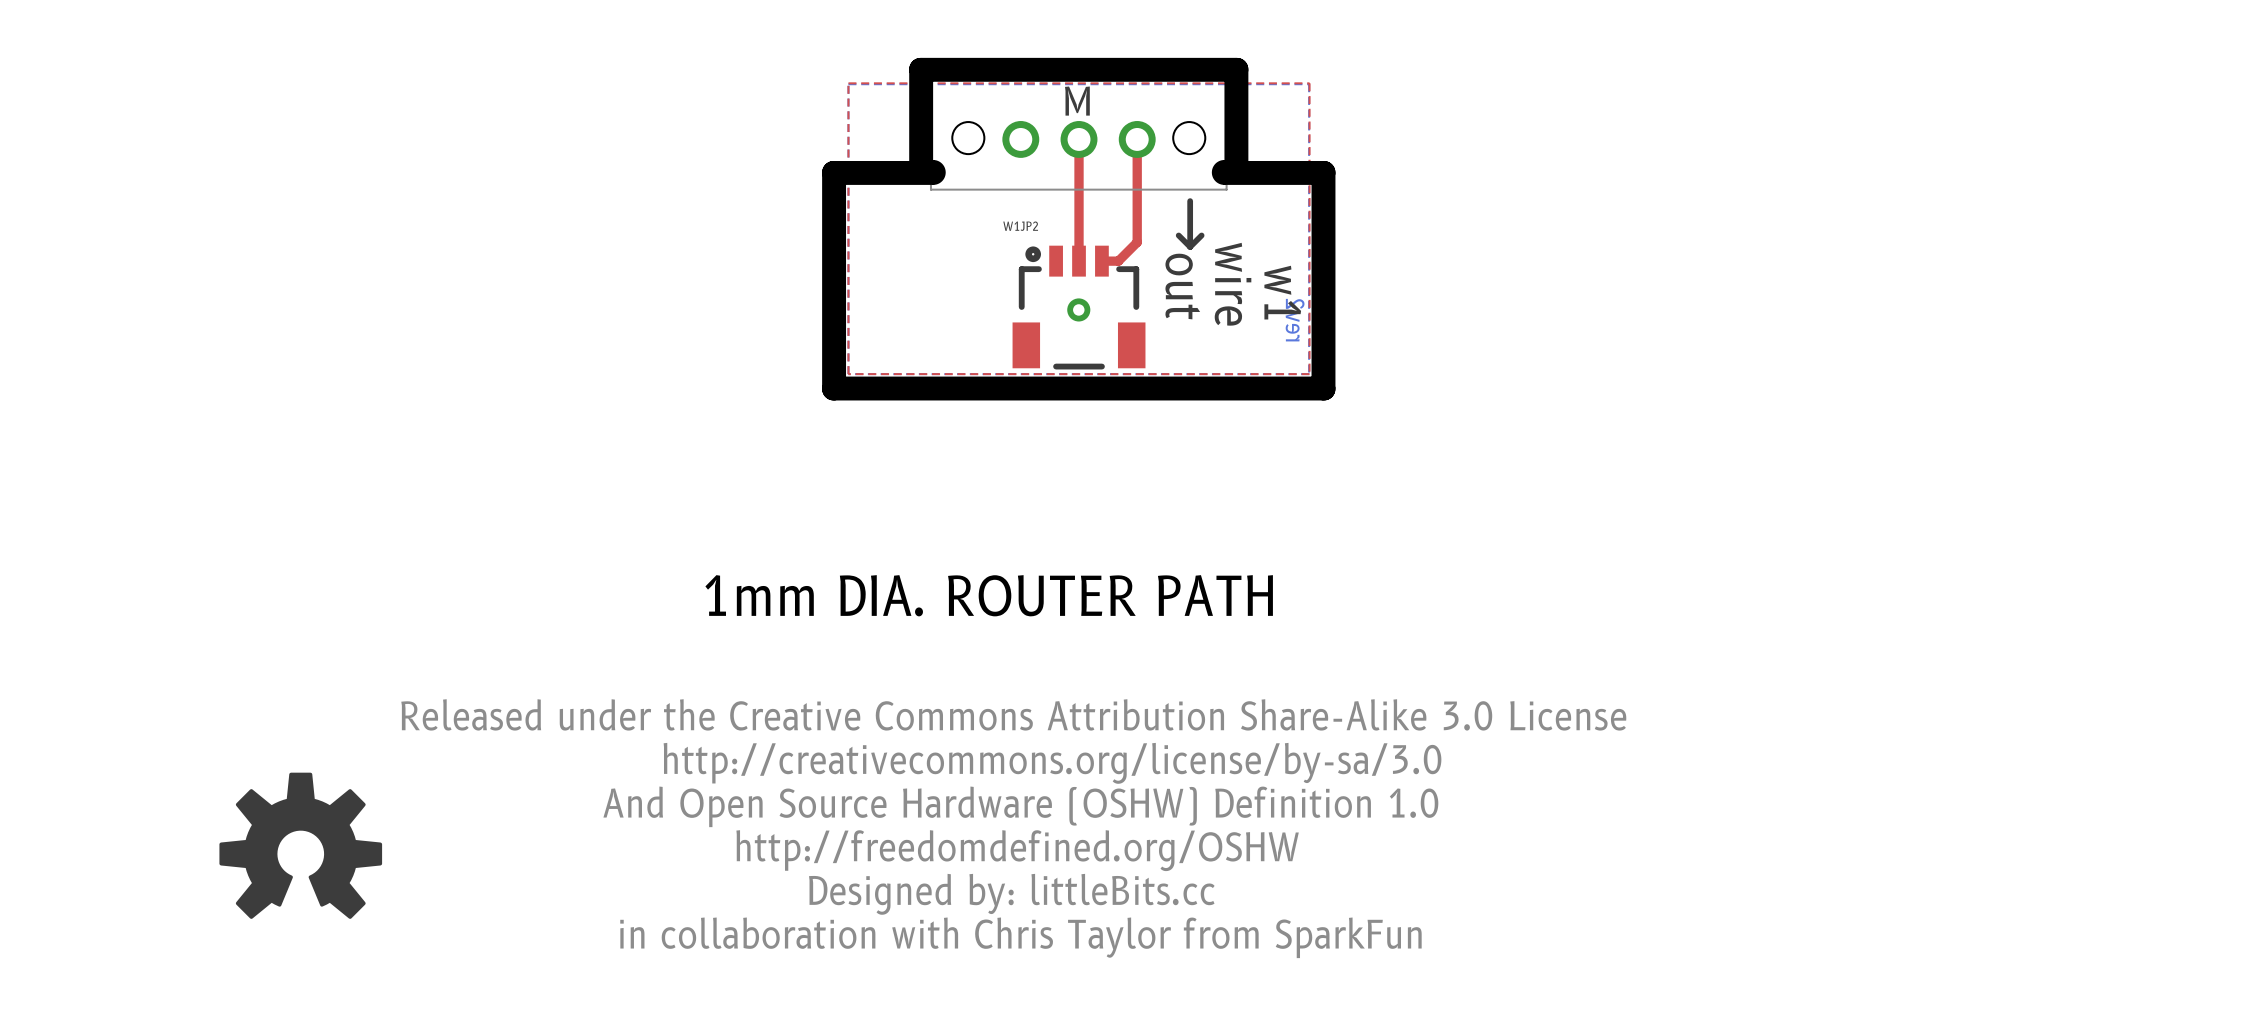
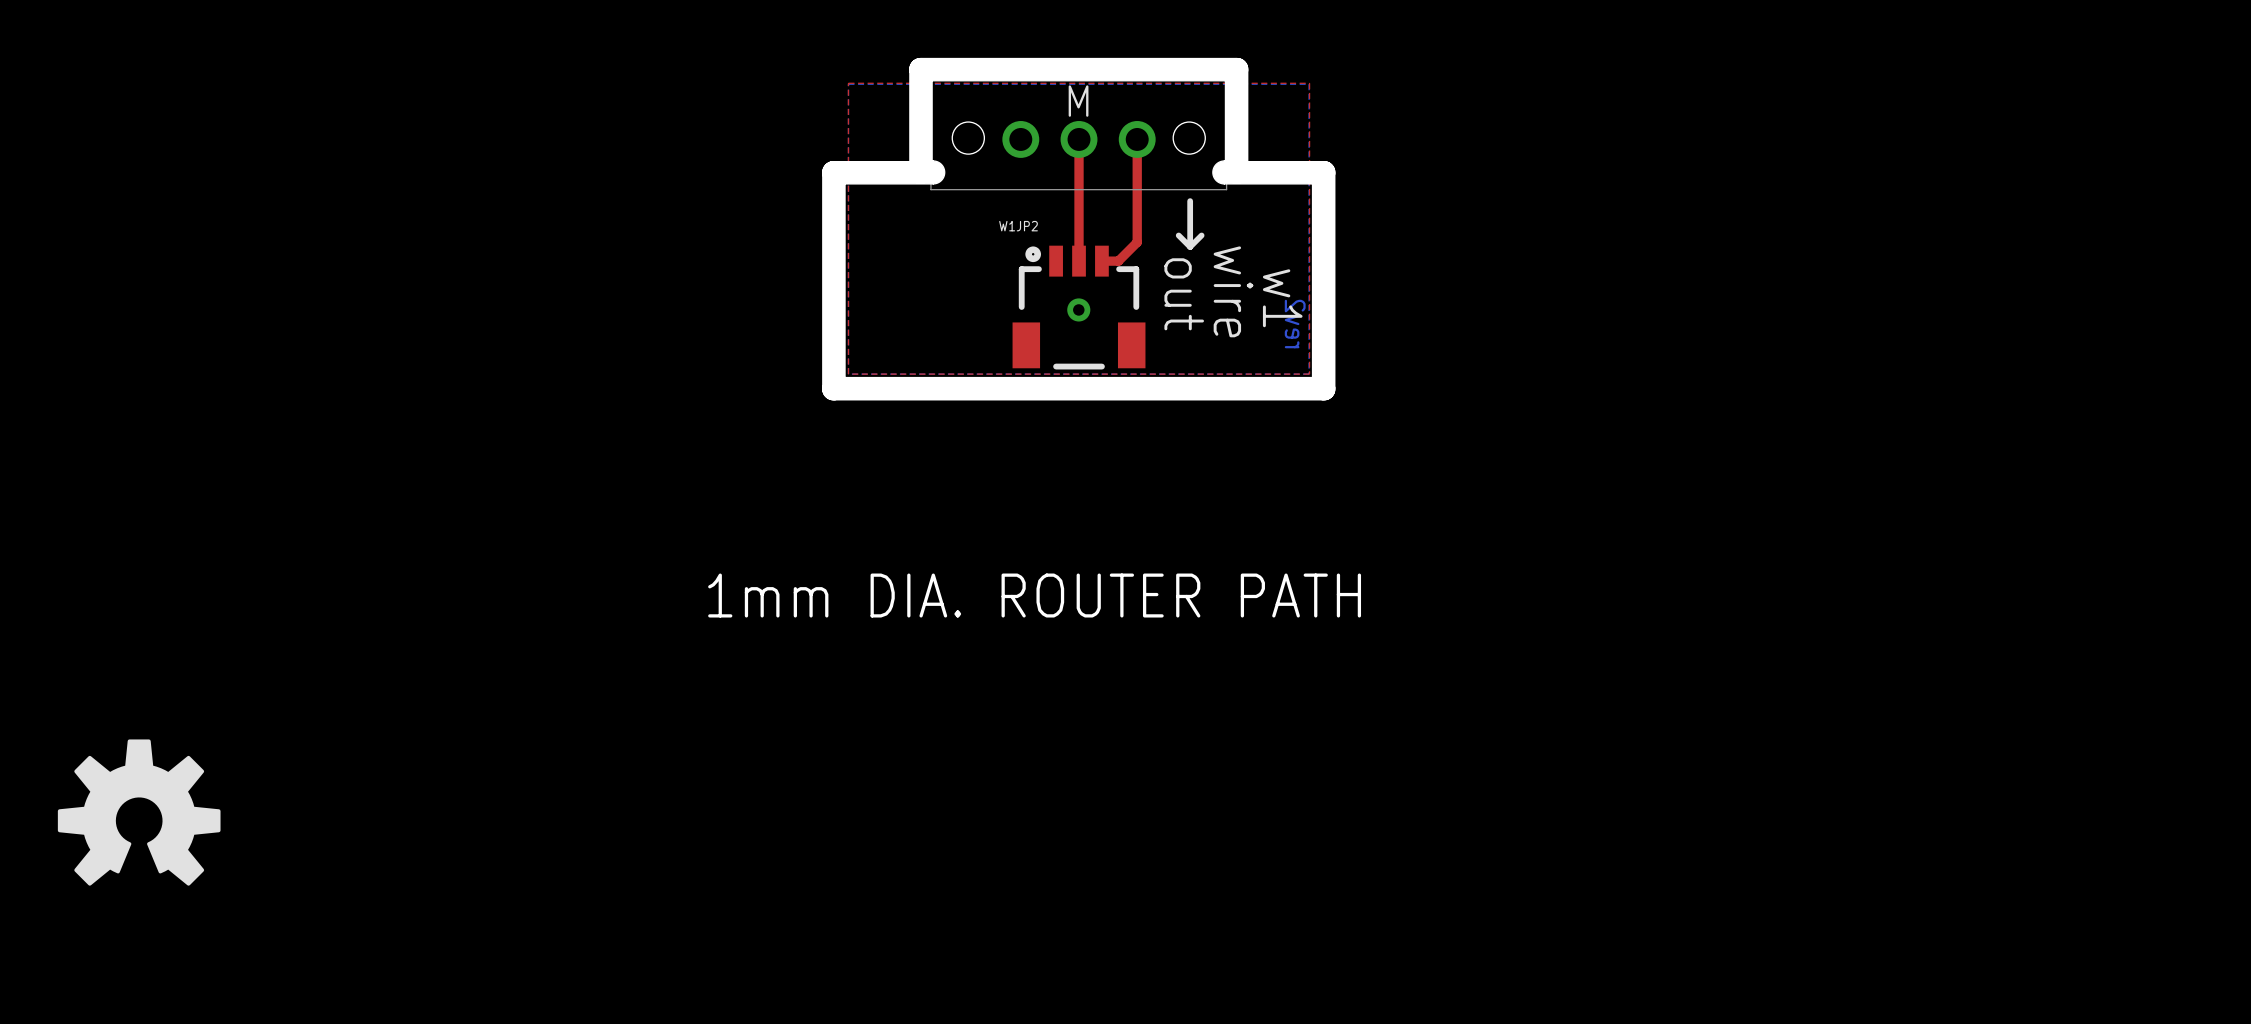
drawing: [401, 699, 1627, 959] -> none
drawing position: (300, 845) -> (139, 812)

